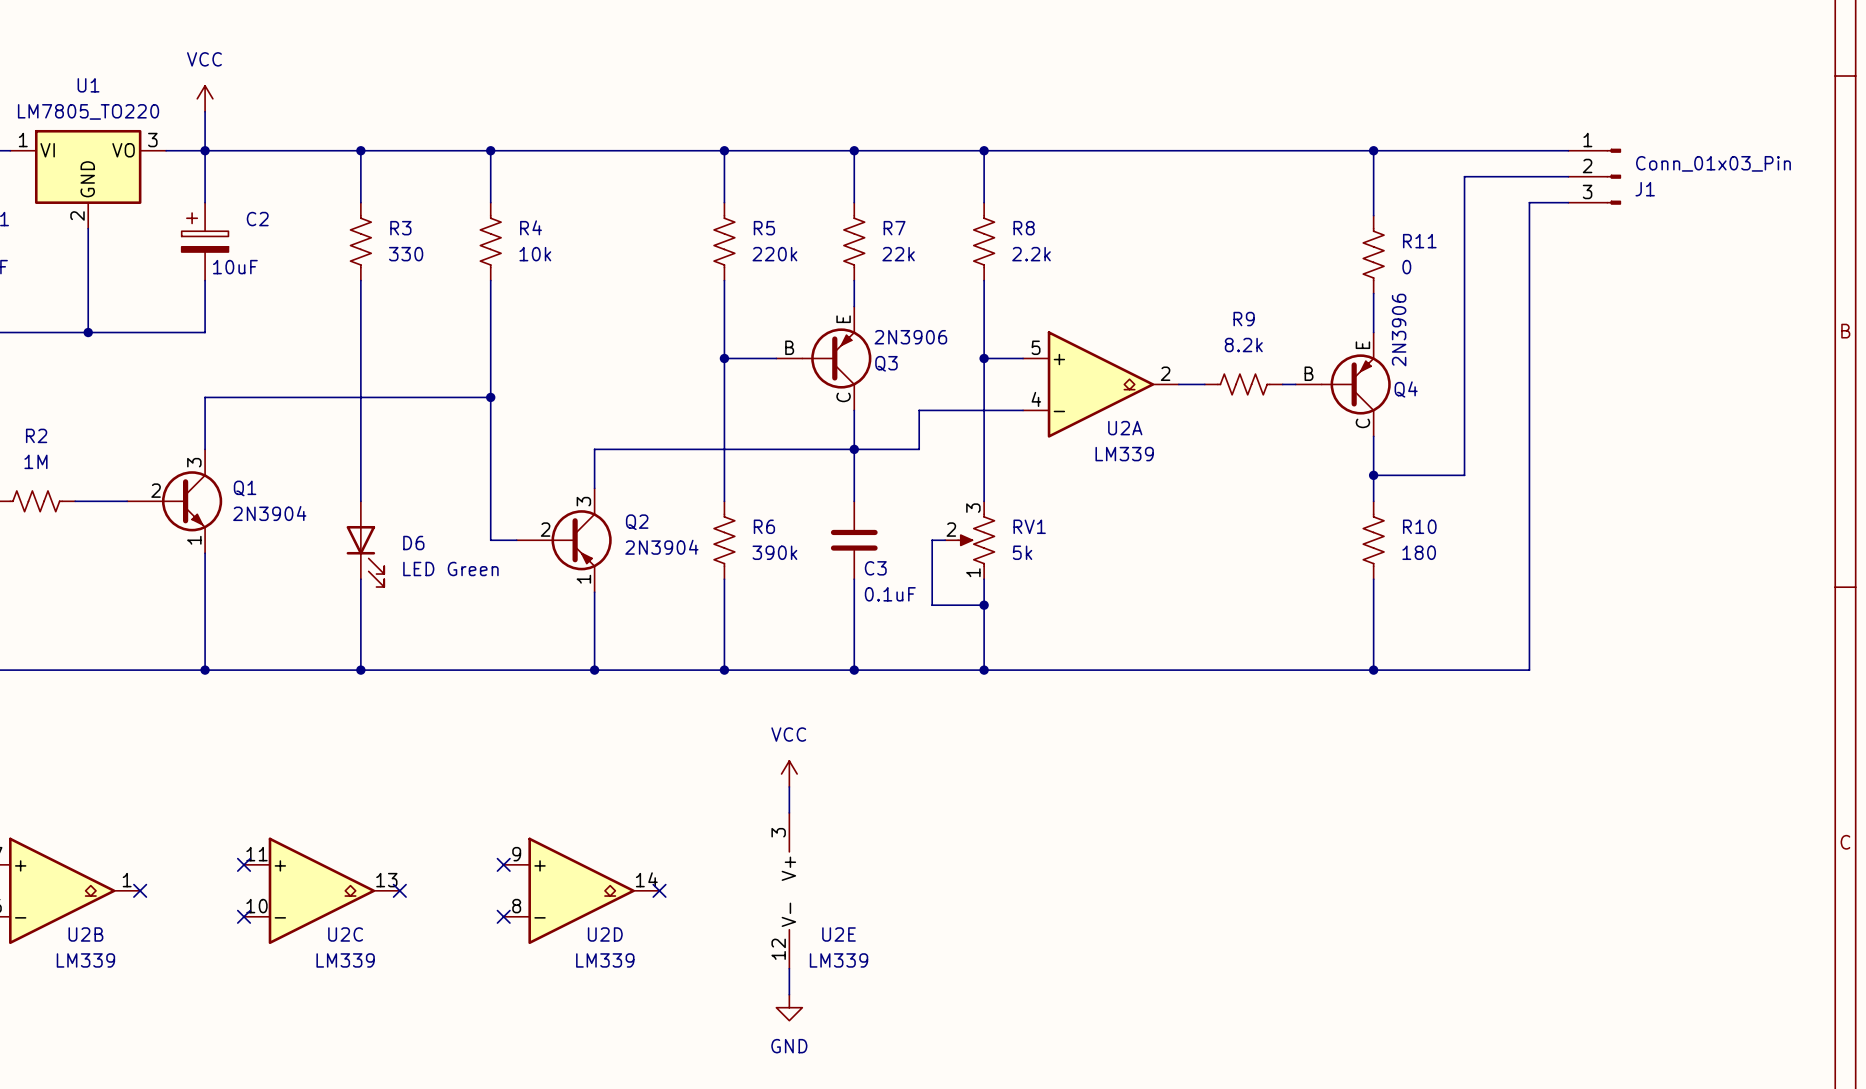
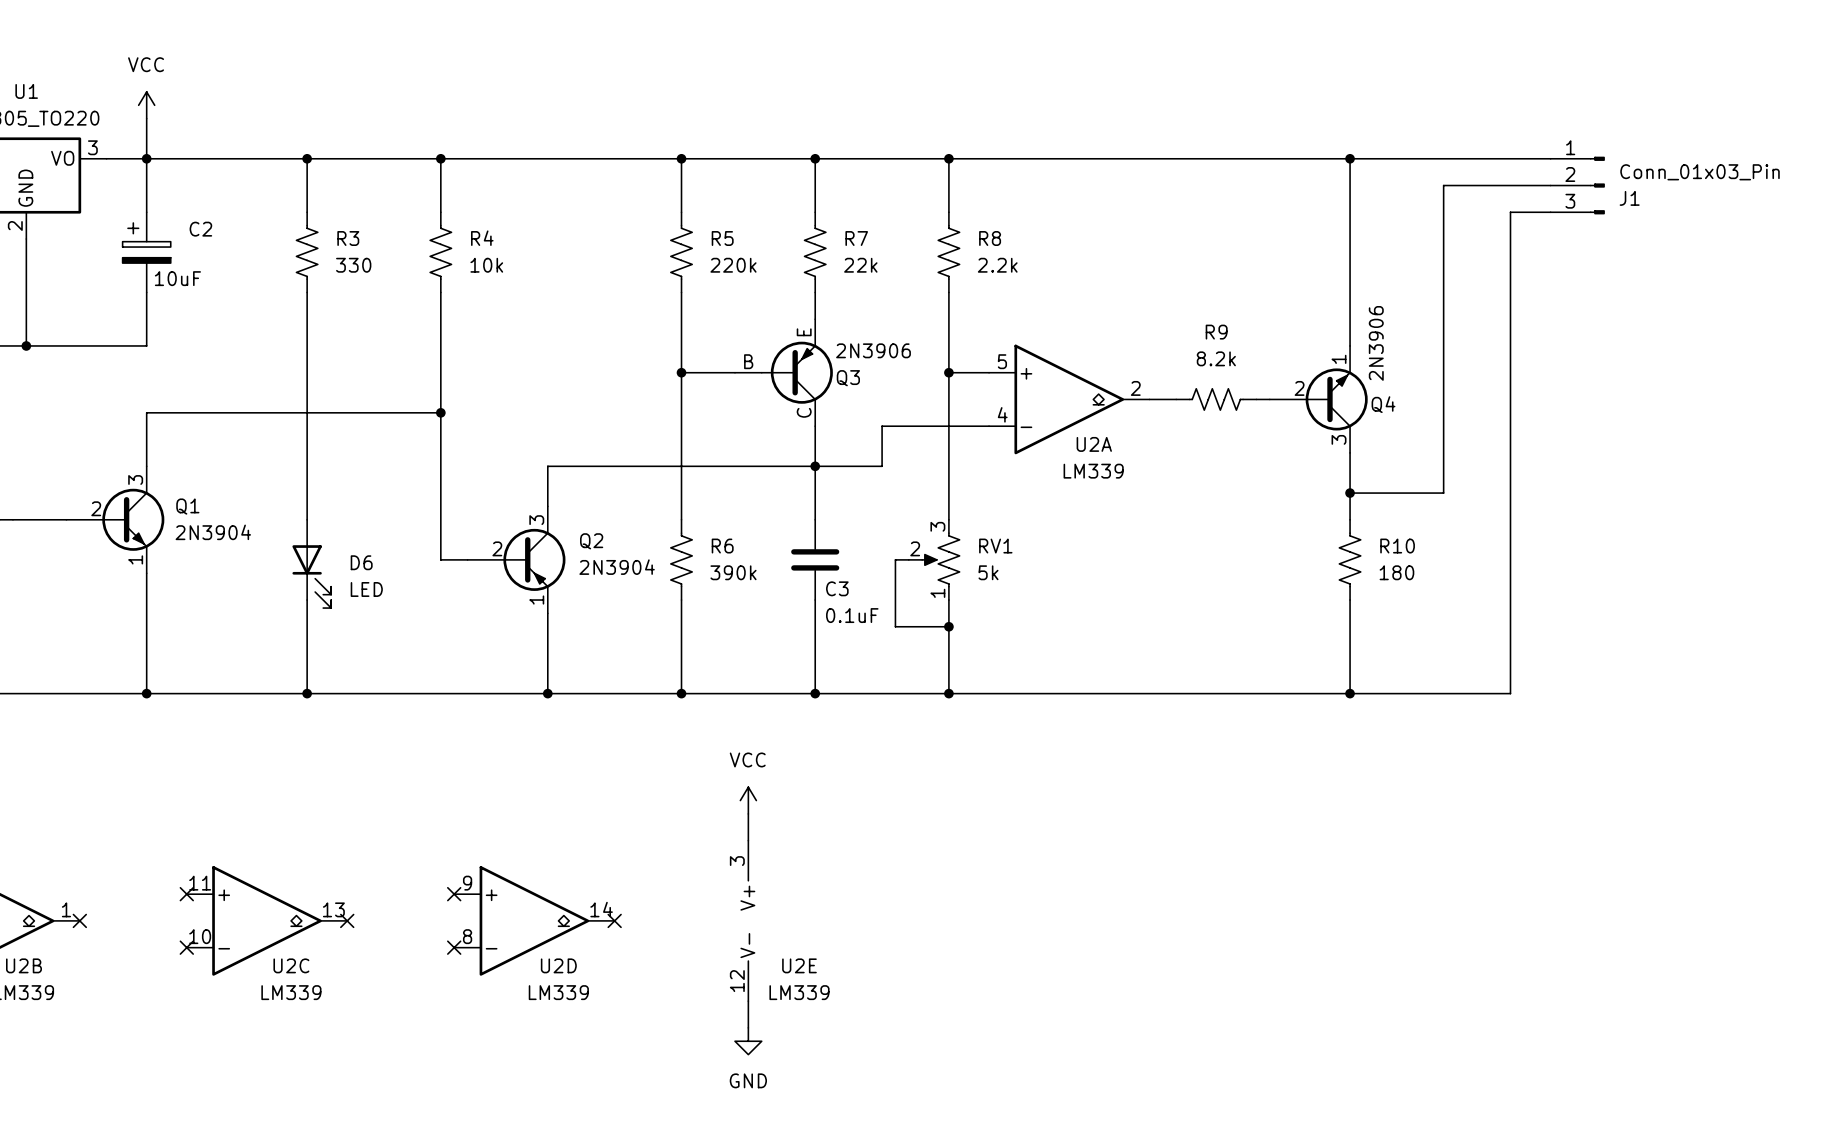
R11: 0 (1373, 254) -> none
Q4 symbol: [1295, 332, 1391, 437] -> [1269, 345, 1368, 453]
D6 value: LED Green (450, 568) -> LED (366, 589)

